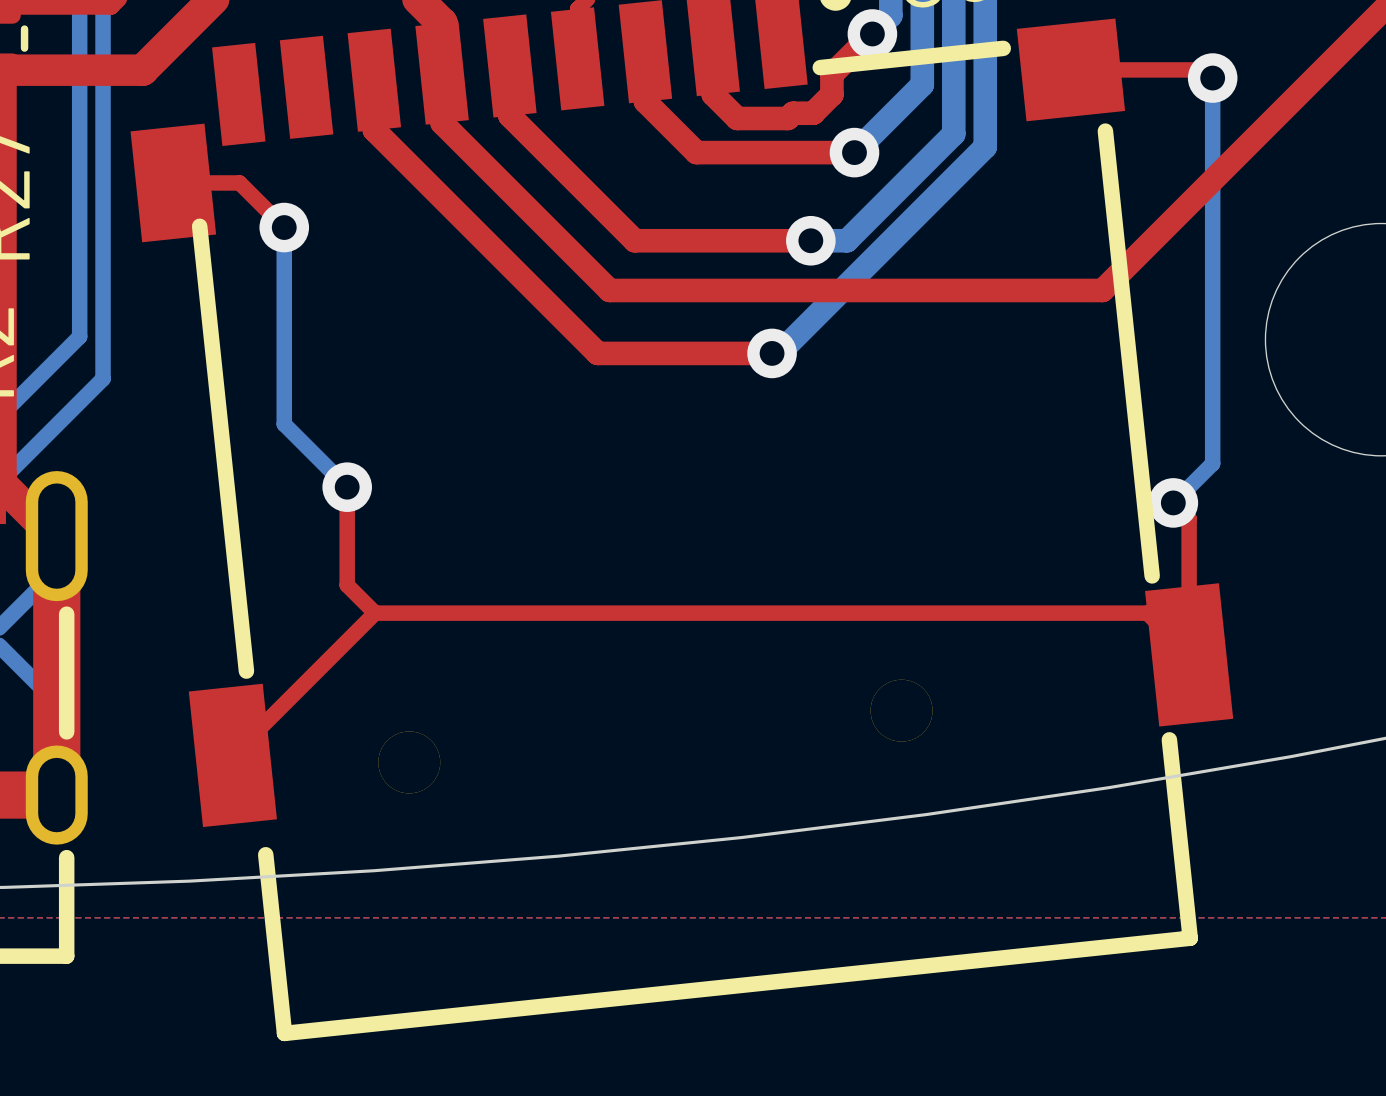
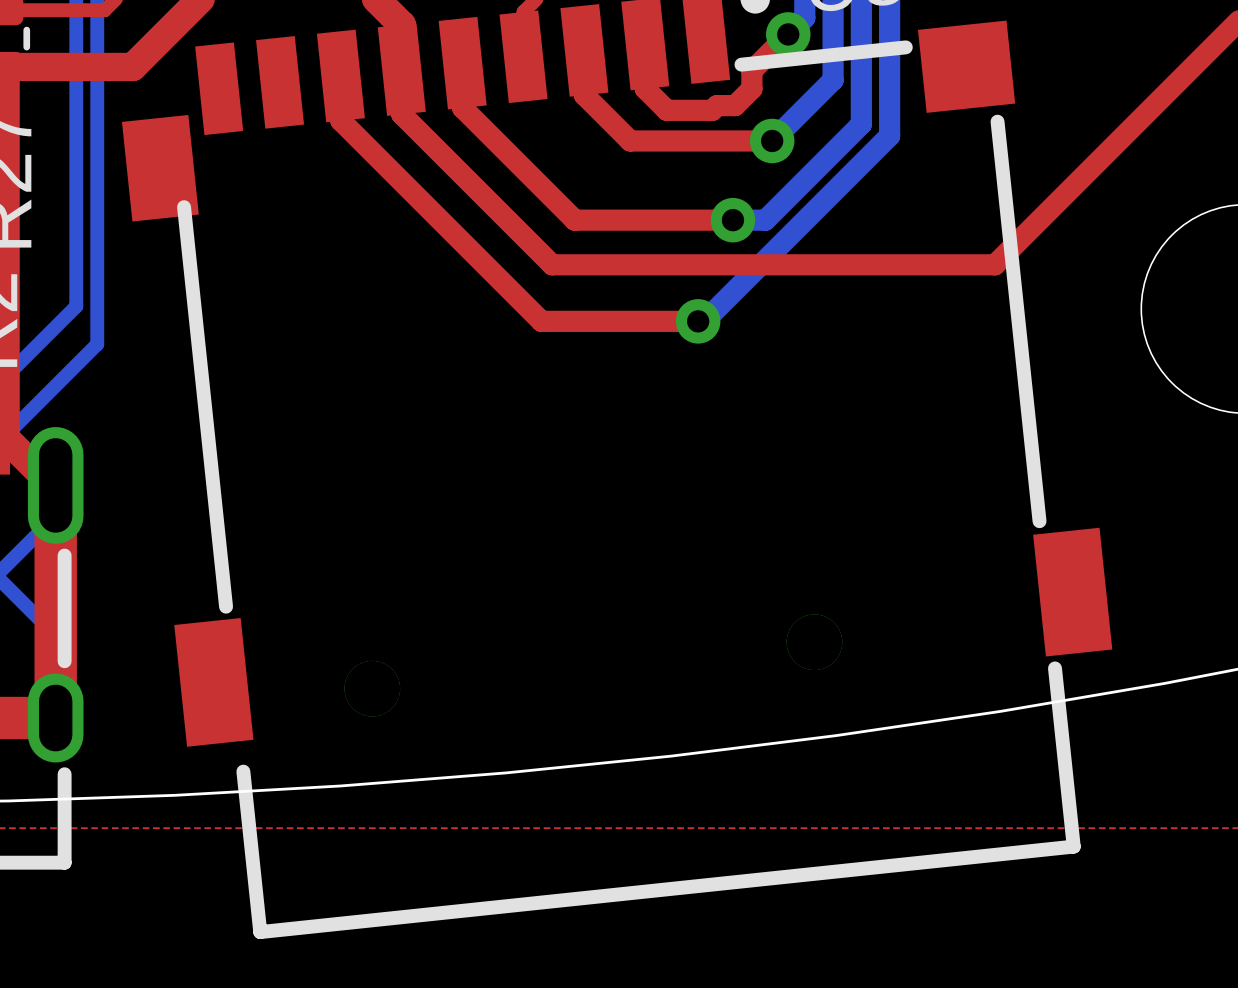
top track: (1070, 69) (1204, 69) (1212, 78) -> none
bottom track: (1212, 78) (1212, 463) (1173, 502) -> none
via: (1212, 78) -> none
top track: (173, 182) (239, 182) (284, 227) -> none
bottom track: (284, 227) (284, 424) (347, 487) -> none
via: (284, 227) -> none
top track: (347, 487) (347, 585) (375, 613) -> none
via: (347, 487) -> none
top track: (1173, 502) (1189, 518) (1189, 654) (1147, 613) (375, 613) -> none
via: (1173, 502) -> none
top track: (375, 613) (232, 755) -> none

